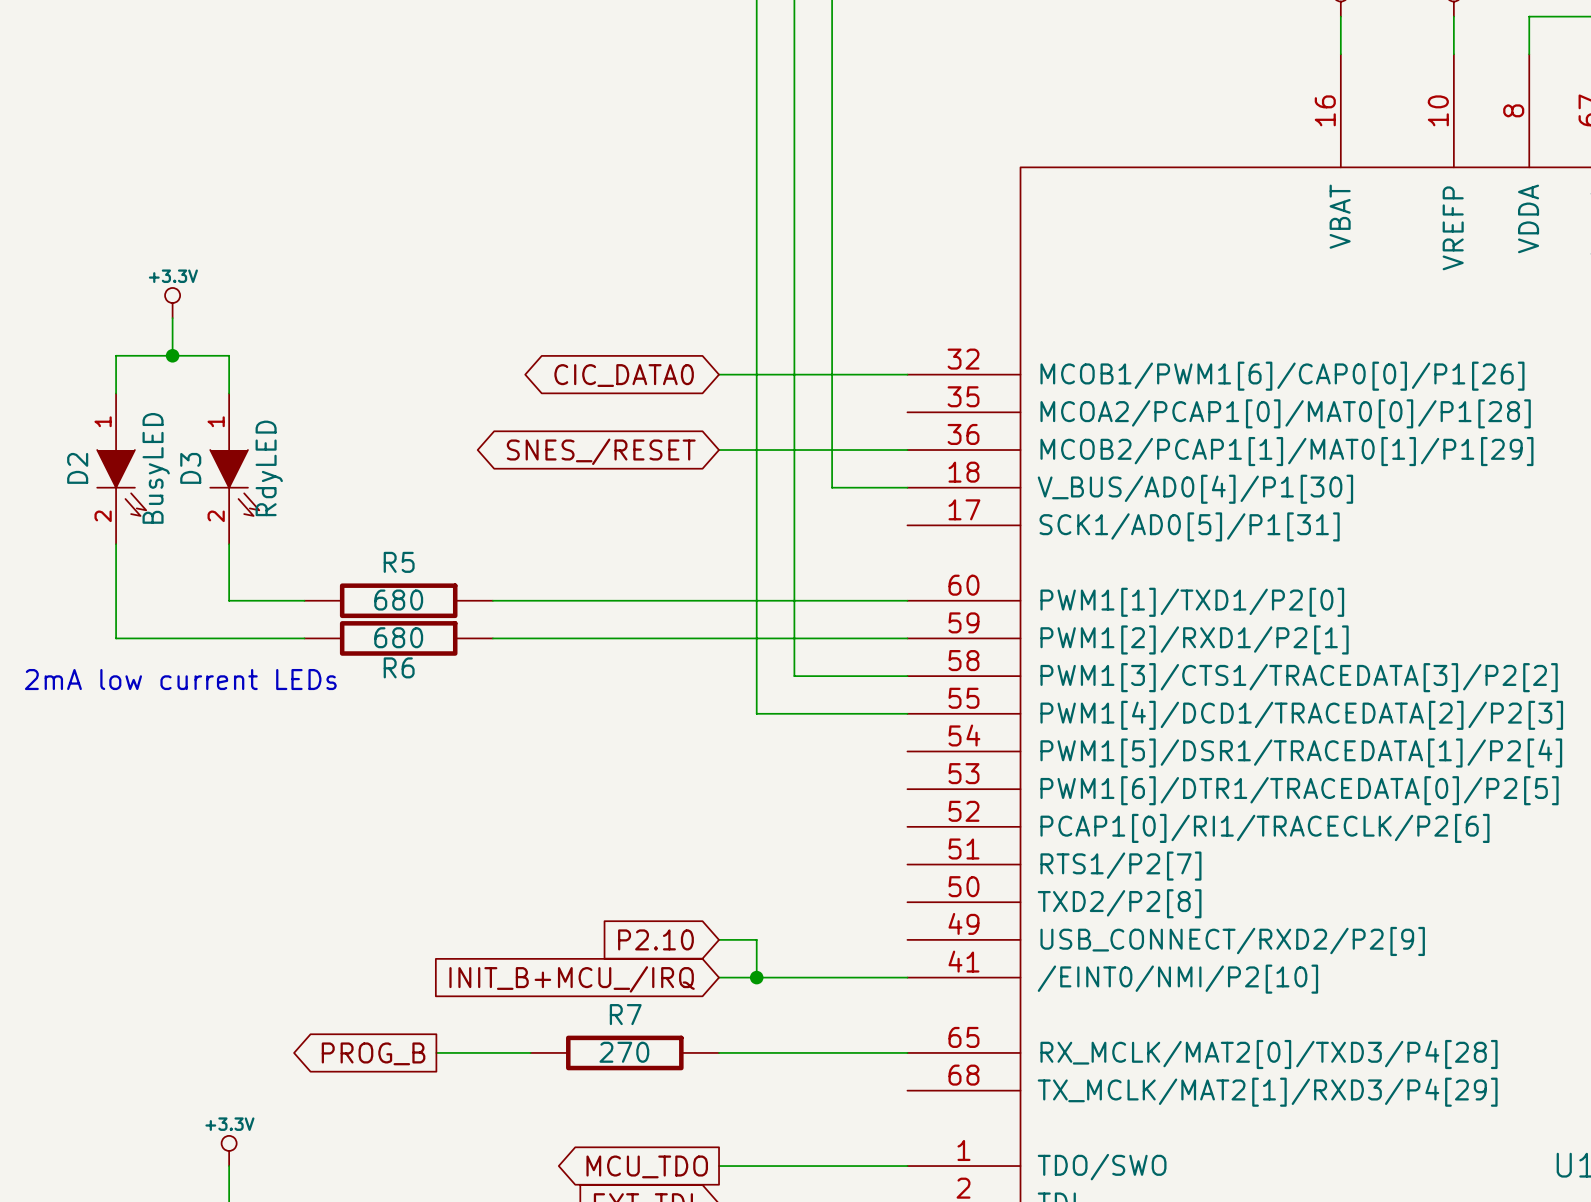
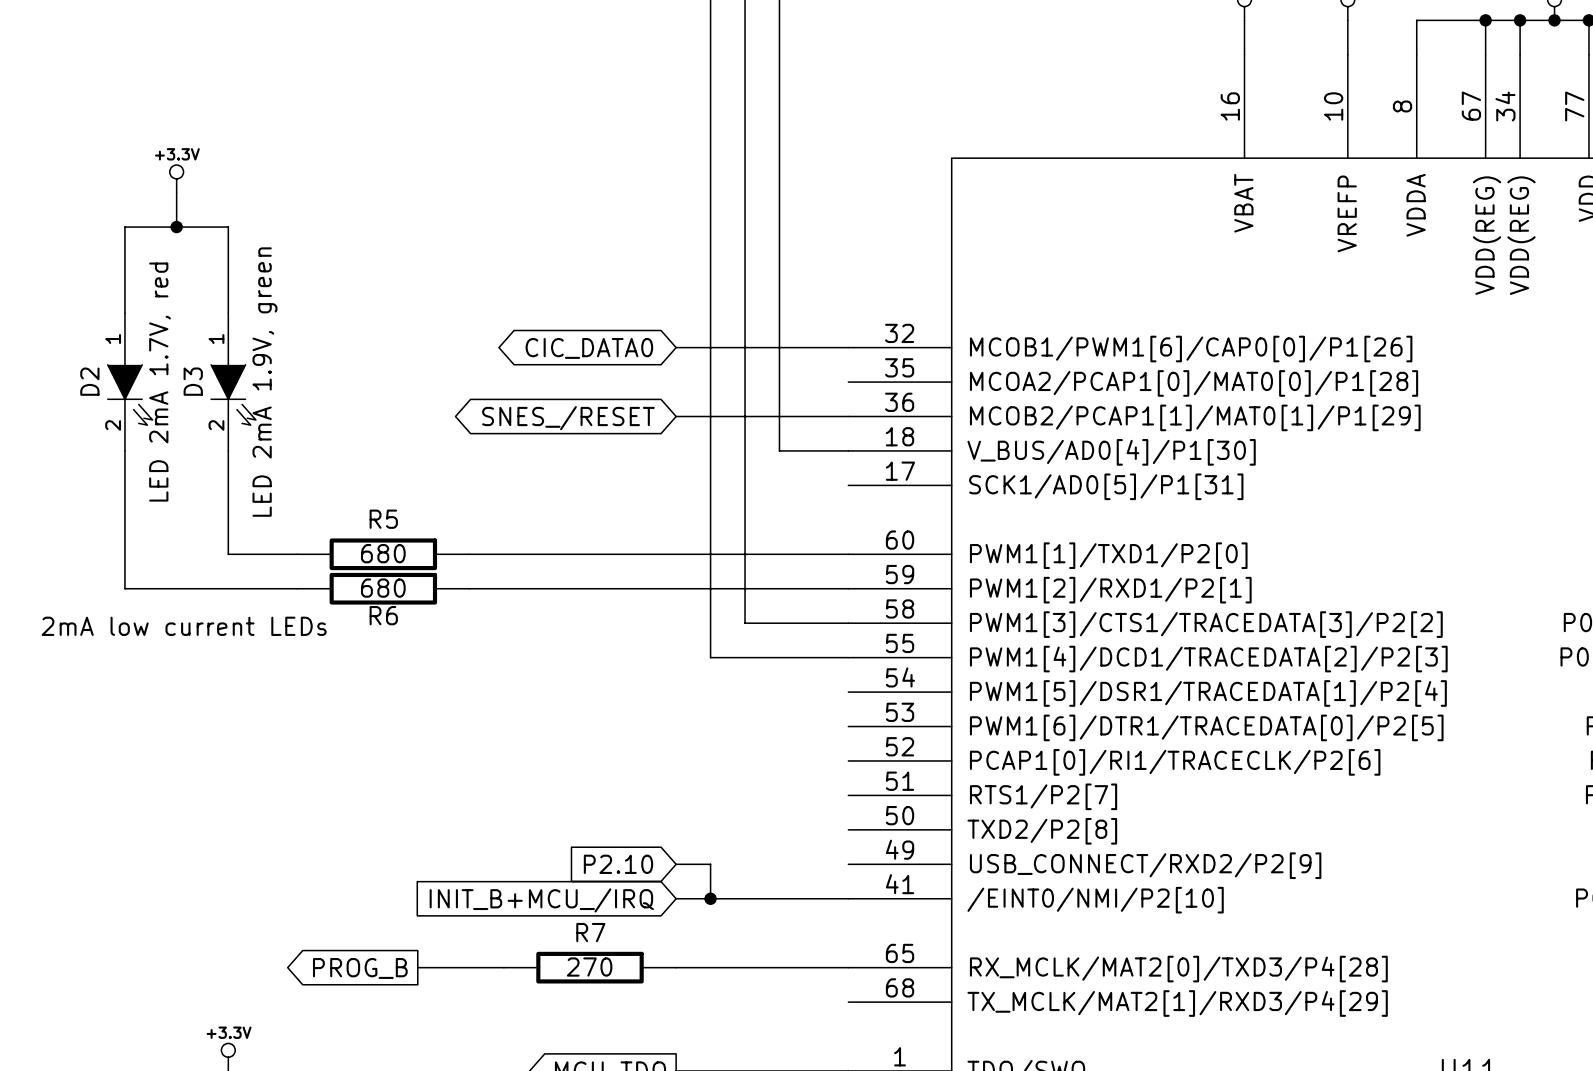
junction: none -> (176, 227)
power symbol position: +3.3V (172, 303) -> +3.3V (176, 178)
wire: (172, 318) (172, 355) -> (176, 192) (176, 227)
wire: none -> (124, 313) (124, 227) (228, 227) (228, 313)
junction: (172, 355) -> none
wire: (116, 393) (116, 355) (229, 355) (229, 393) -> none
D2 position: (121, 468) -> (130, 382)
D2 value: BusyLED (156, 468) -> LED 2mA 1.7V, red (160, 382)
D3 position: (234, 468) -> (233, 382)
D3 value: RdyLED (269, 468) -> LED 2mA 1.9V, green (264, 382)

